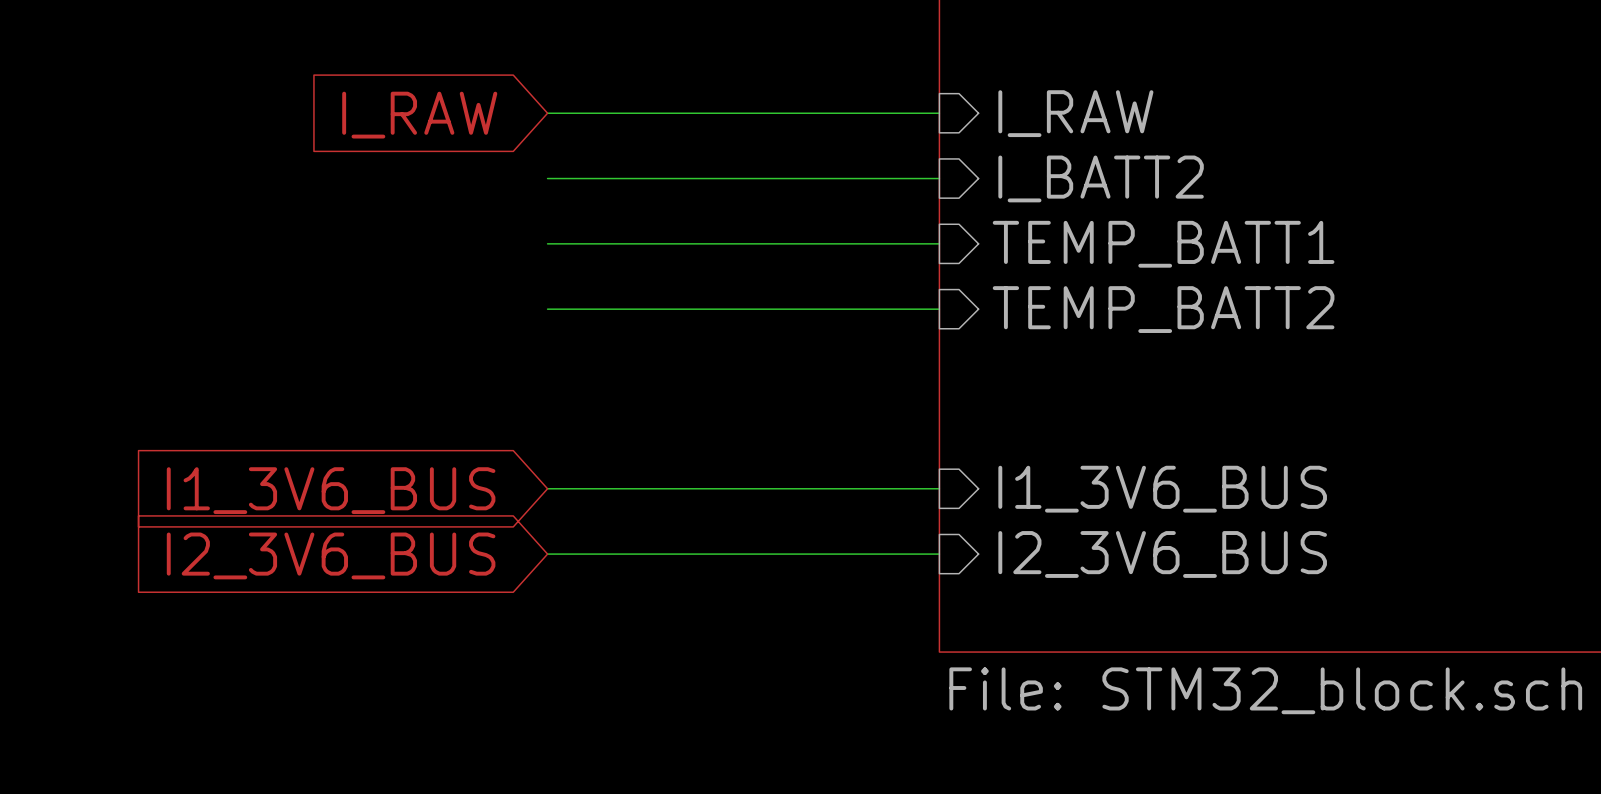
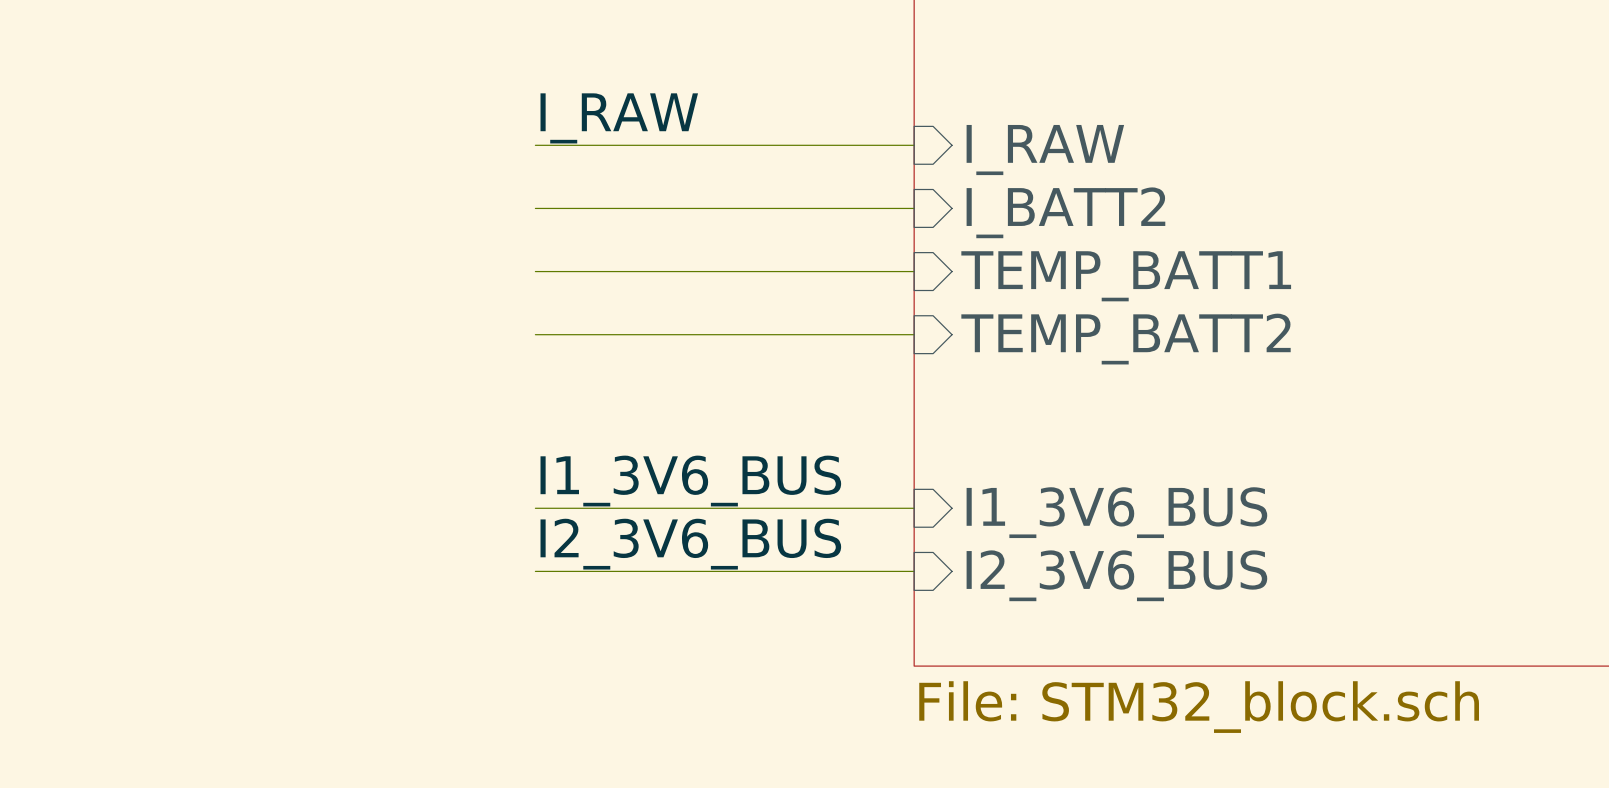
label: none -> I_RAW (619, 118)
global label: I_RAW (419, 115) -> none
label: none -> I1_3V6_BUS (690, 481)
global label: I1_3V6_BUS (331, 490) -> none
label: none -> I2_3V6_BUS (690, 544)
global label: I2_3V6_BUS (331, 555) -> none

